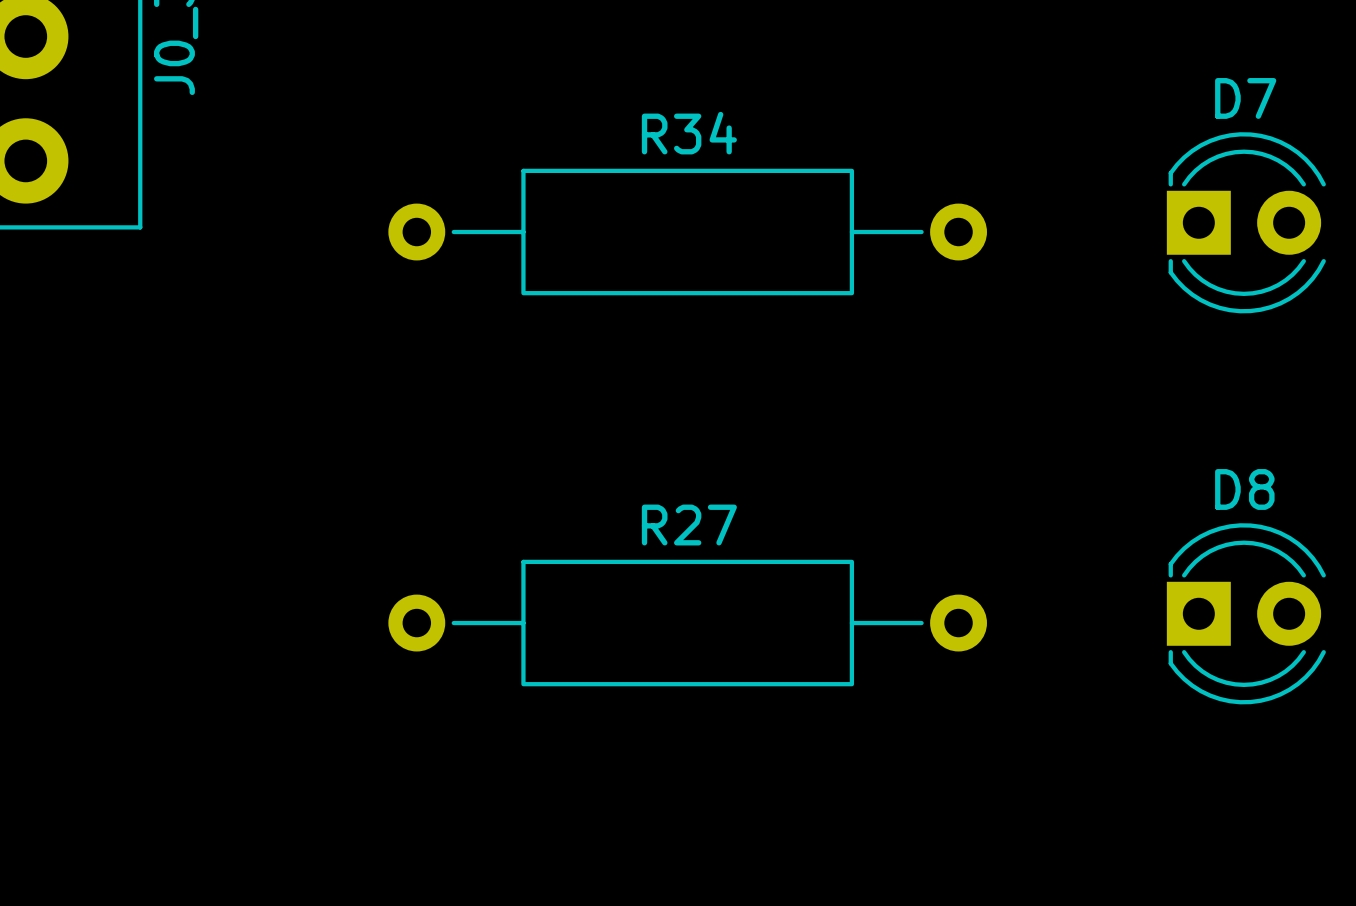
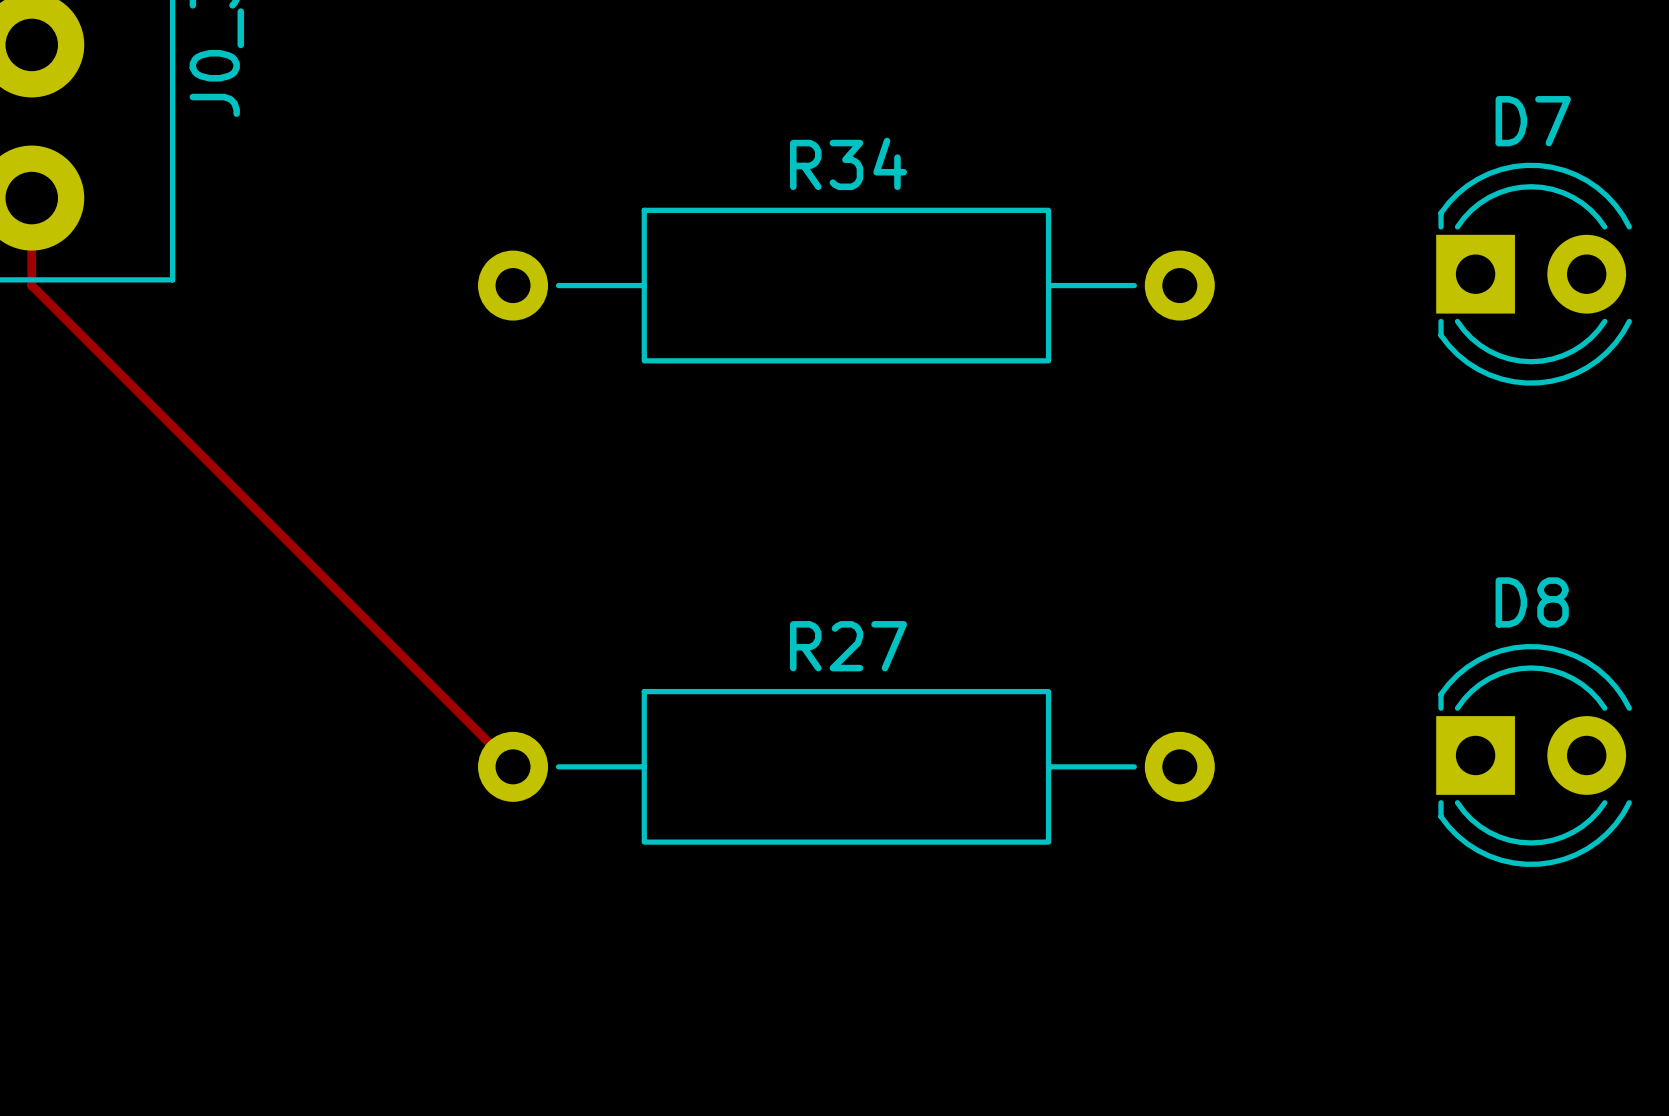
track: none -> (31, 198) (31, 285) (513, 766)

